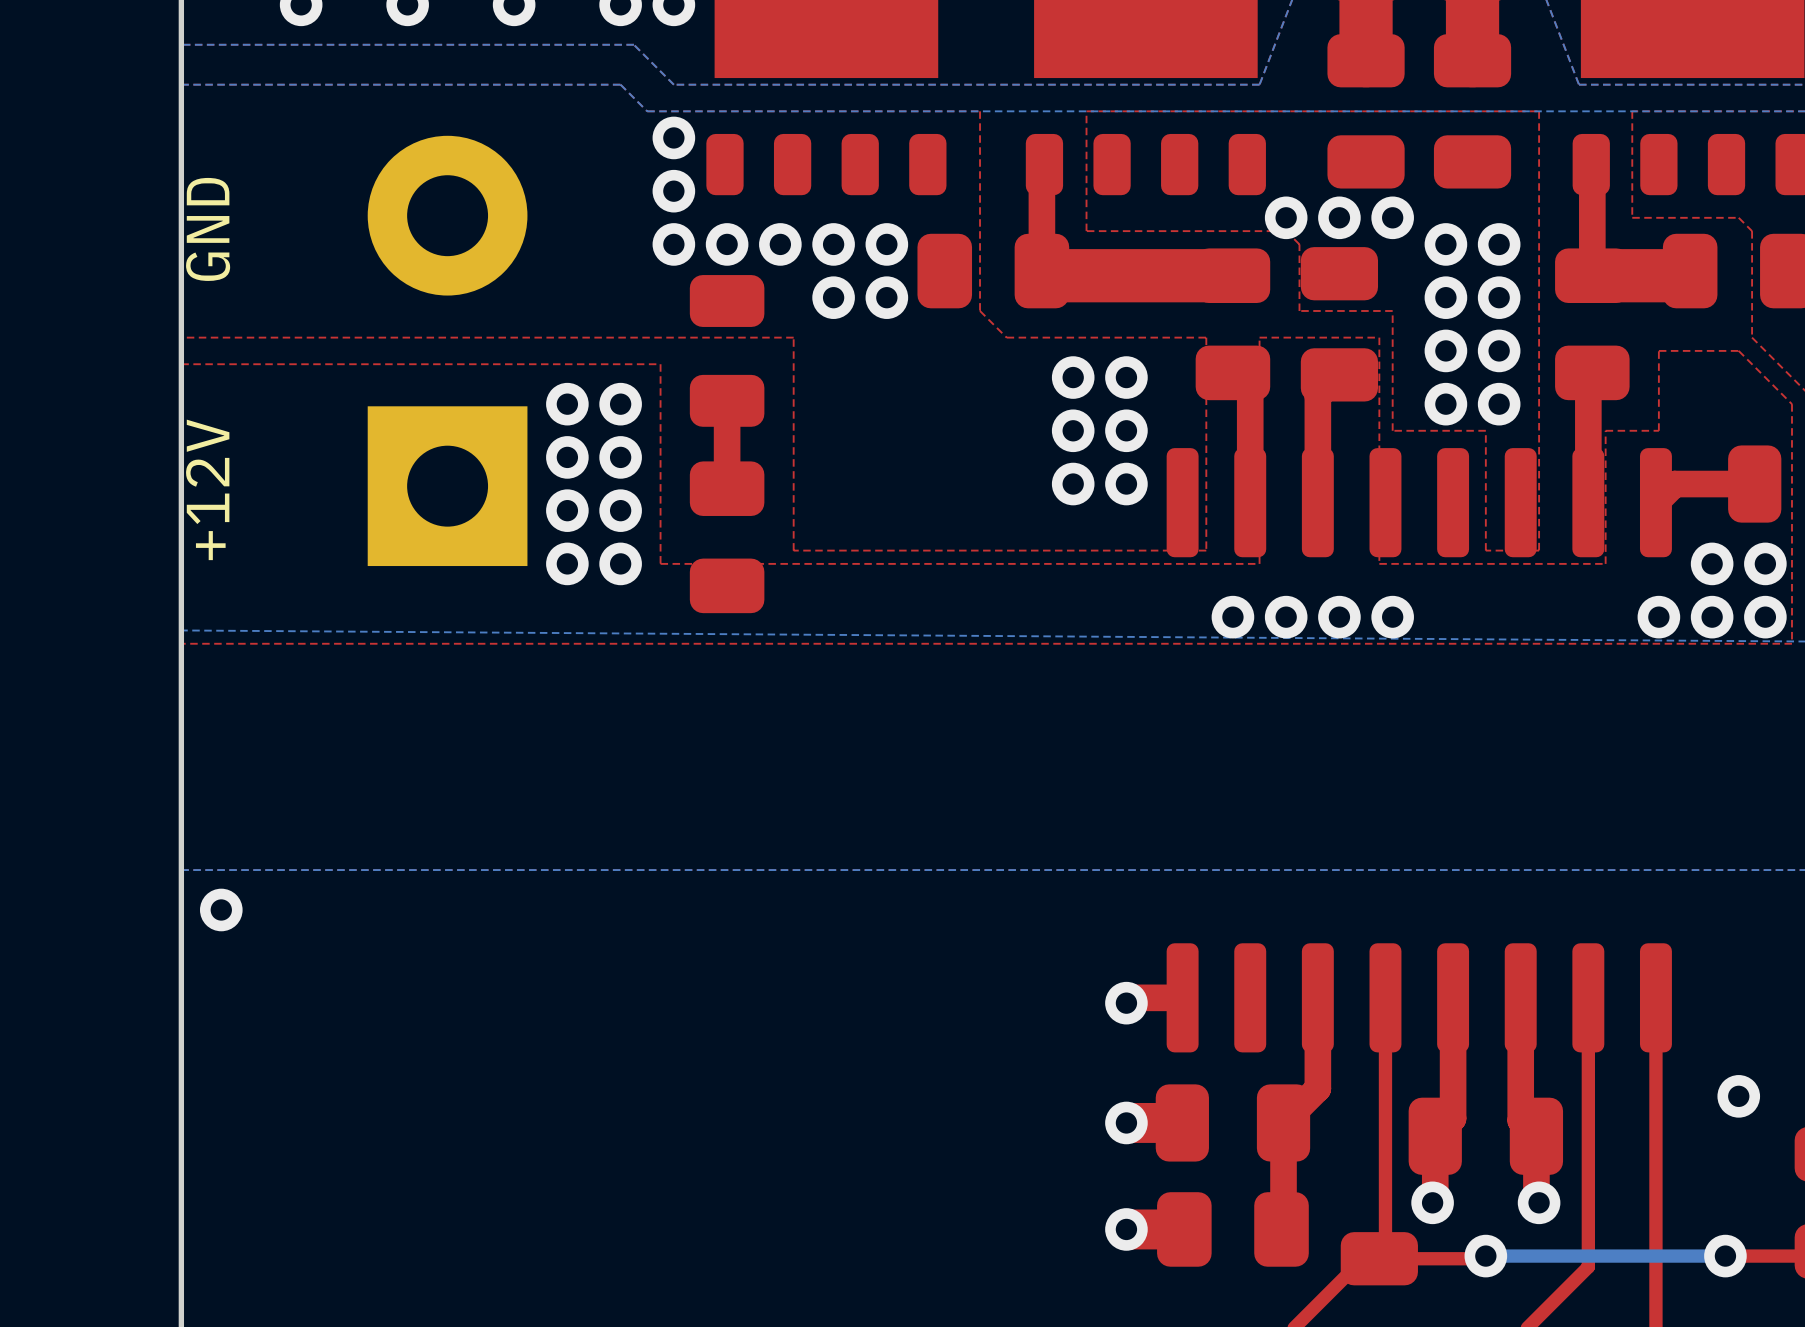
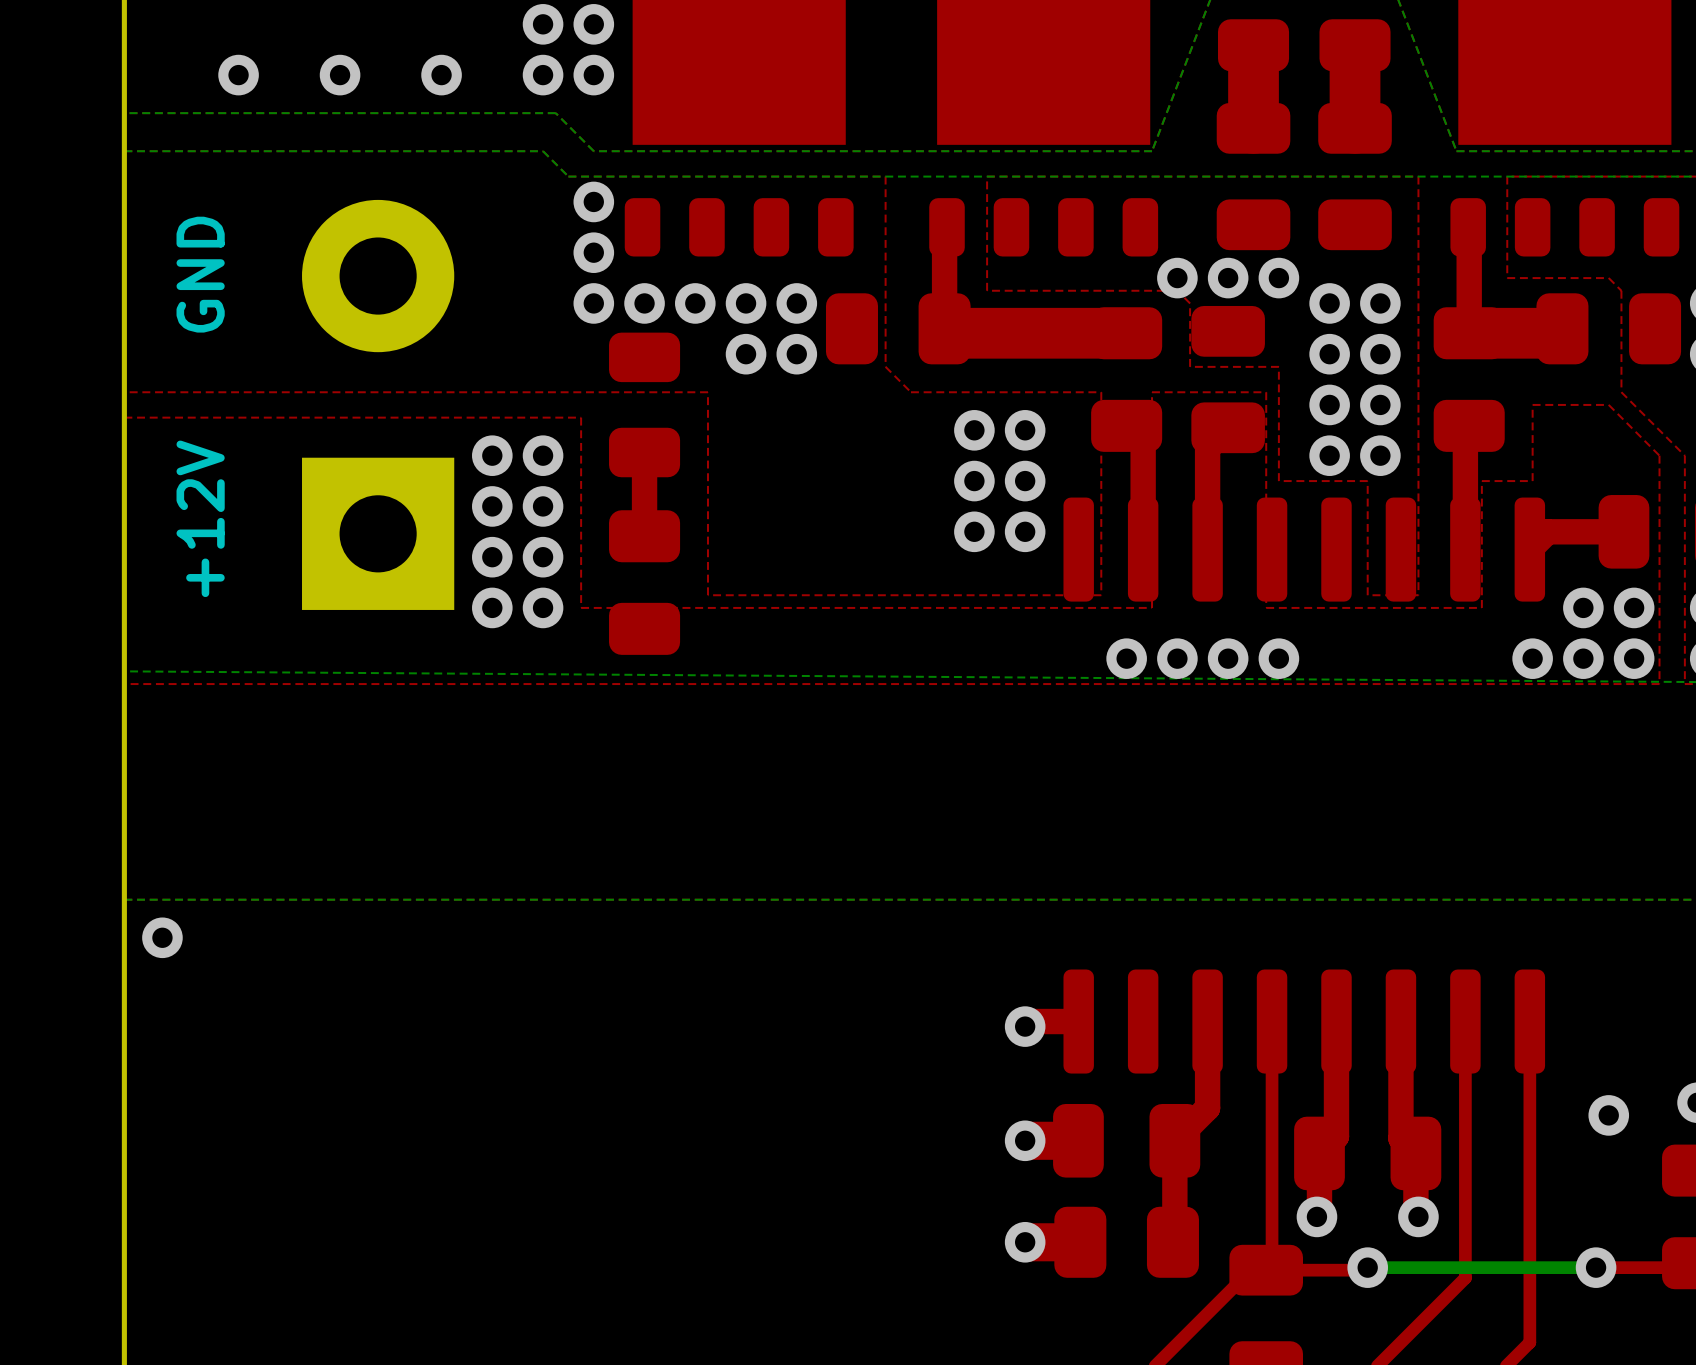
text position: GND (208, 229) -> GND (200, 274)
text position: +12V (207, 489) -> +12V (200, 518)

